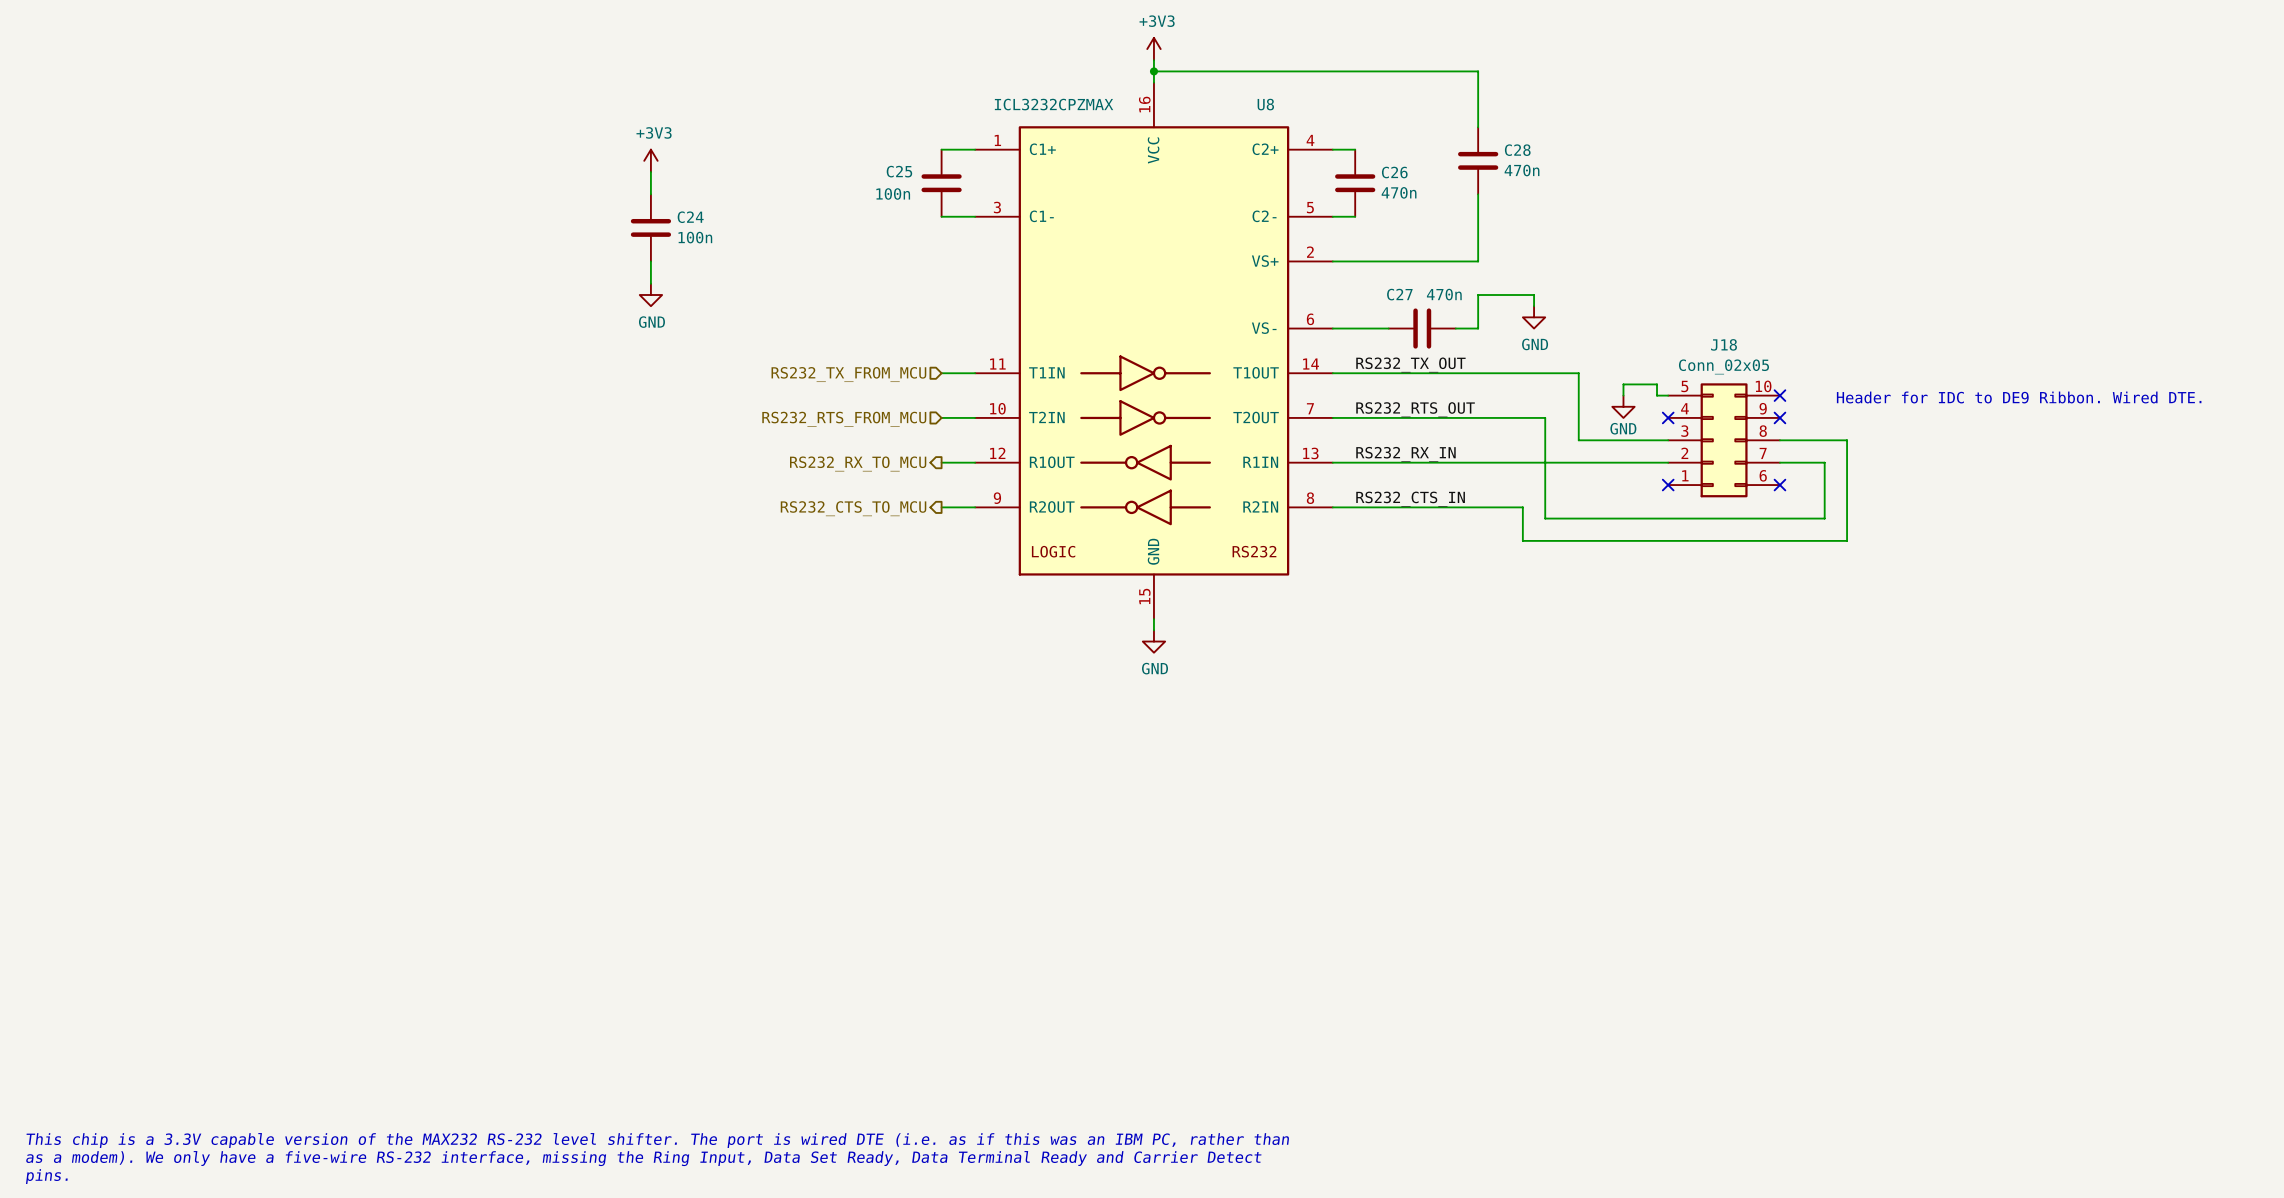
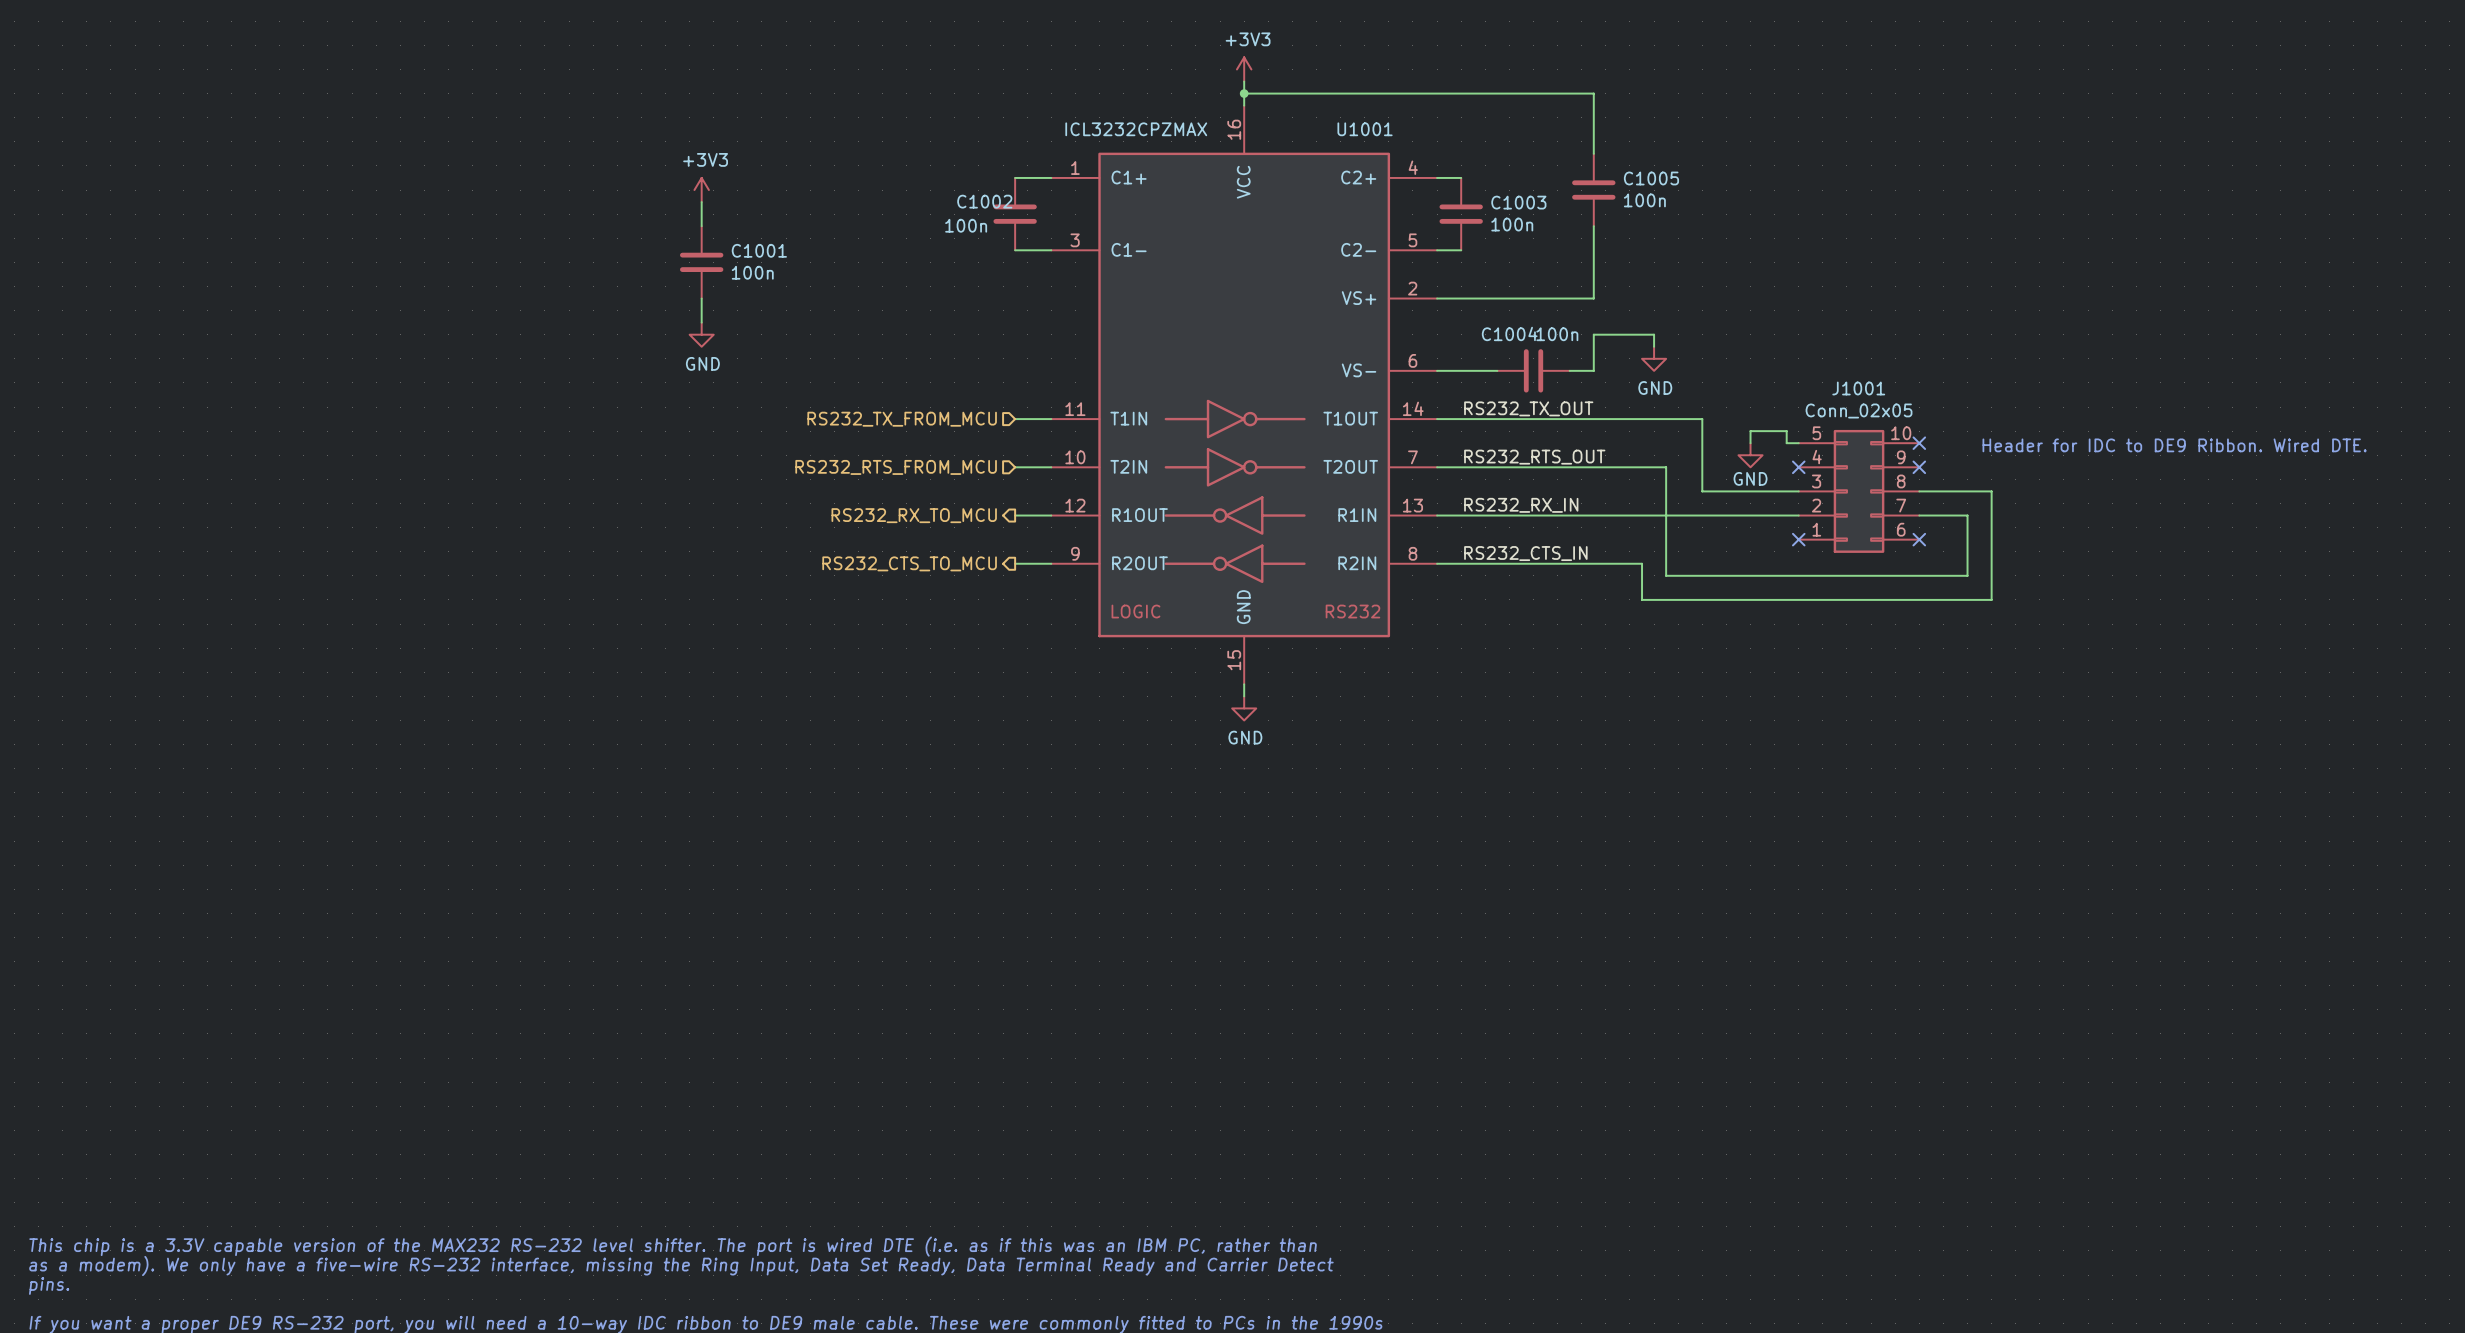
U8 name: U8 (1265, 104) -> U1001 (1365, 129)
C28 name: C28 (1517, 150) -> C1005 (1651, 178)
C28 value: 470n (1522, 170) -> 100n (1644, 200)
C25 name: C25 (899, 171) -> C1002 (984, 201)
C26 name: C26 (1394, 172) -> C1003 (1518, 202)
C26 value: 470n (1399, 192) -> 100n (1512, 224)
C24 name: C24 (690, 217) -> C1001 (759, 250)
C27 name: C27 (1399, 294) -> C1004 (1509, 333)
C27 value: 470n (1444, 294) -> 100n (1557, 334)
J18 name: J18 (1724, 344) -> J1001 (1858, 388)

